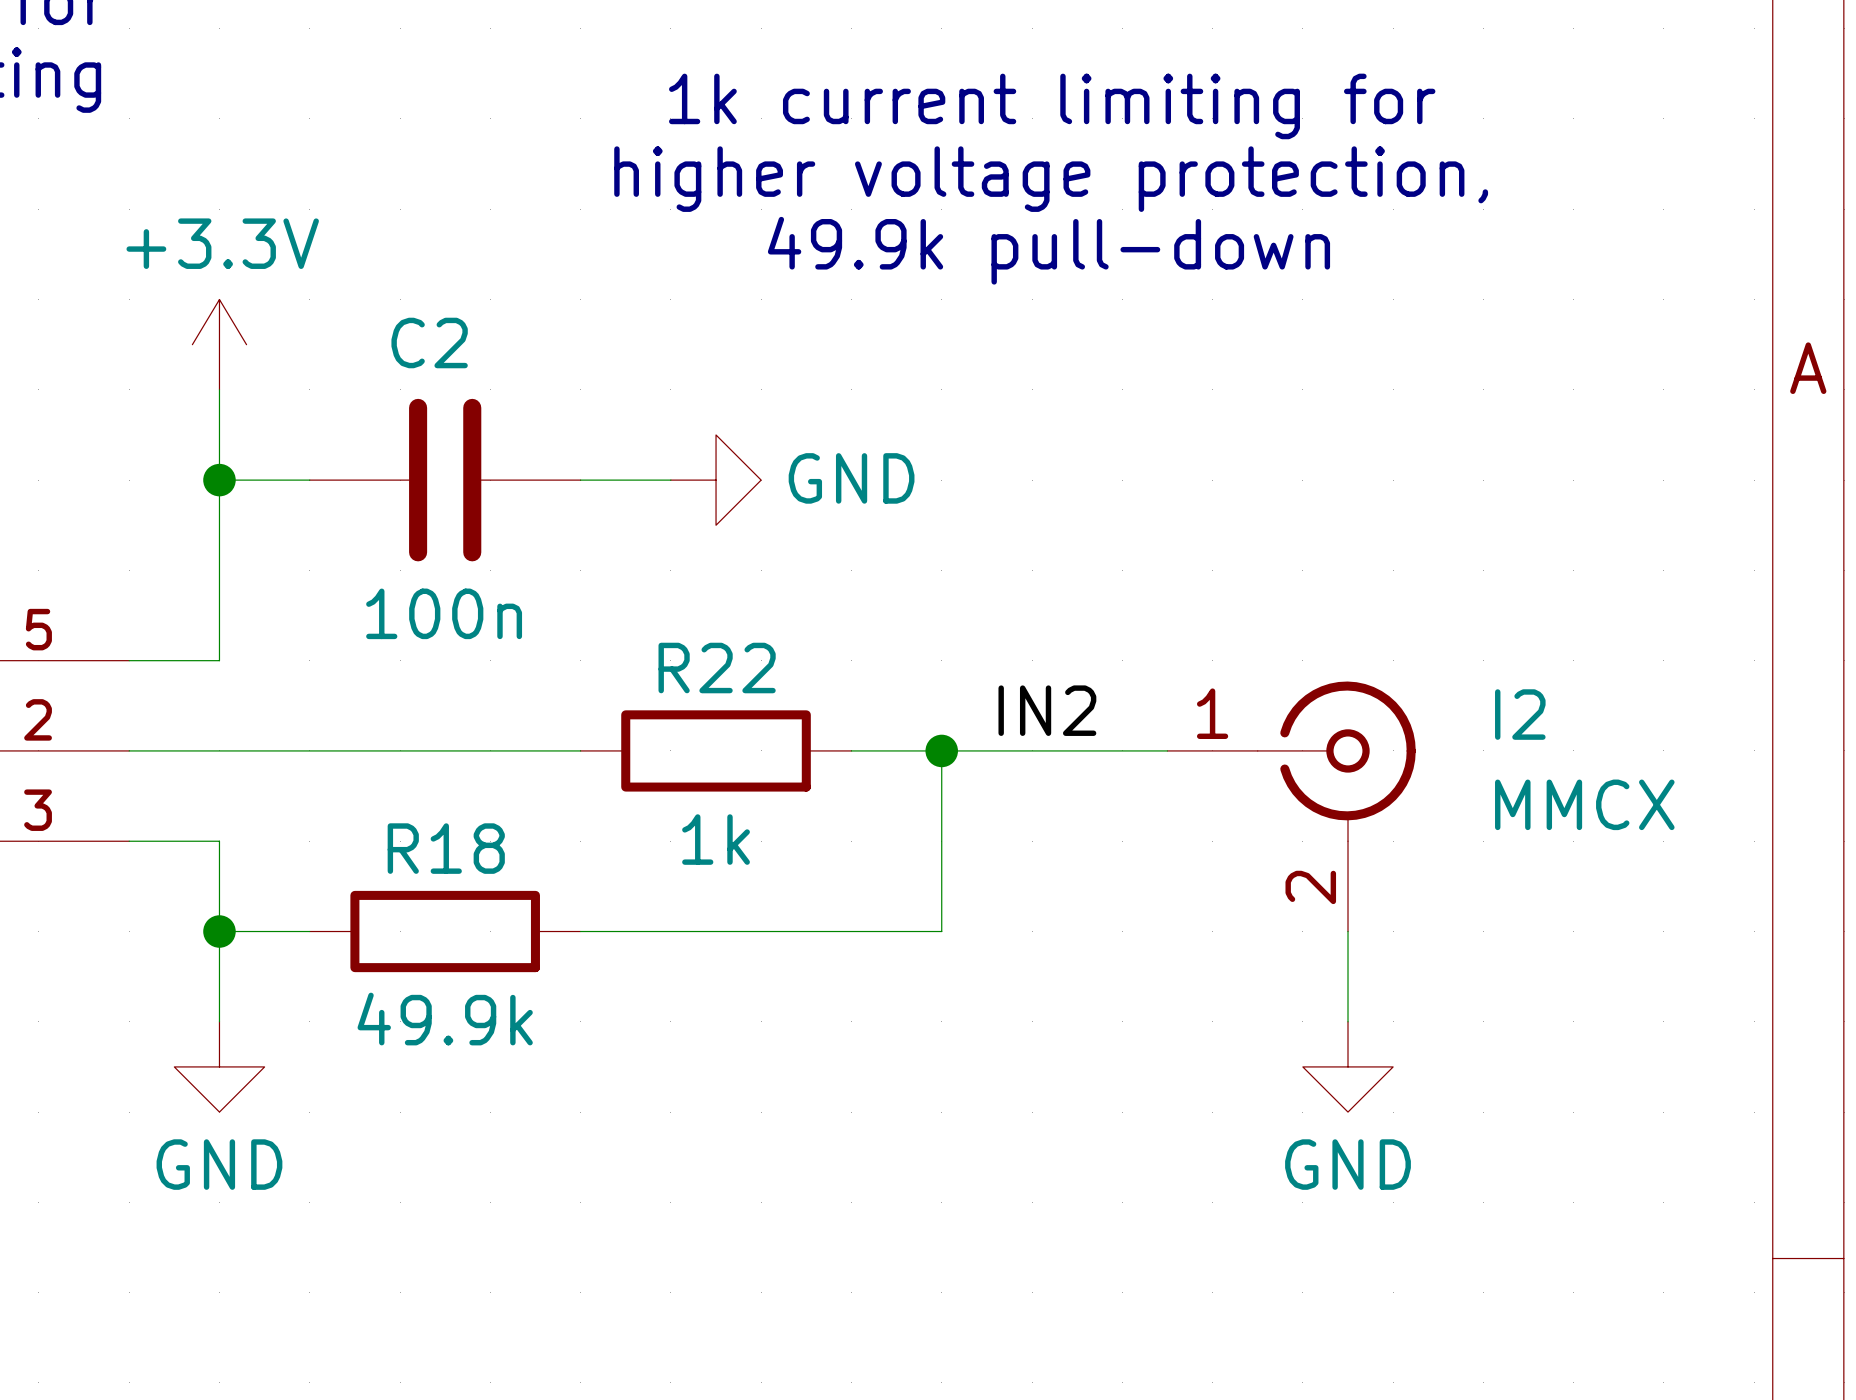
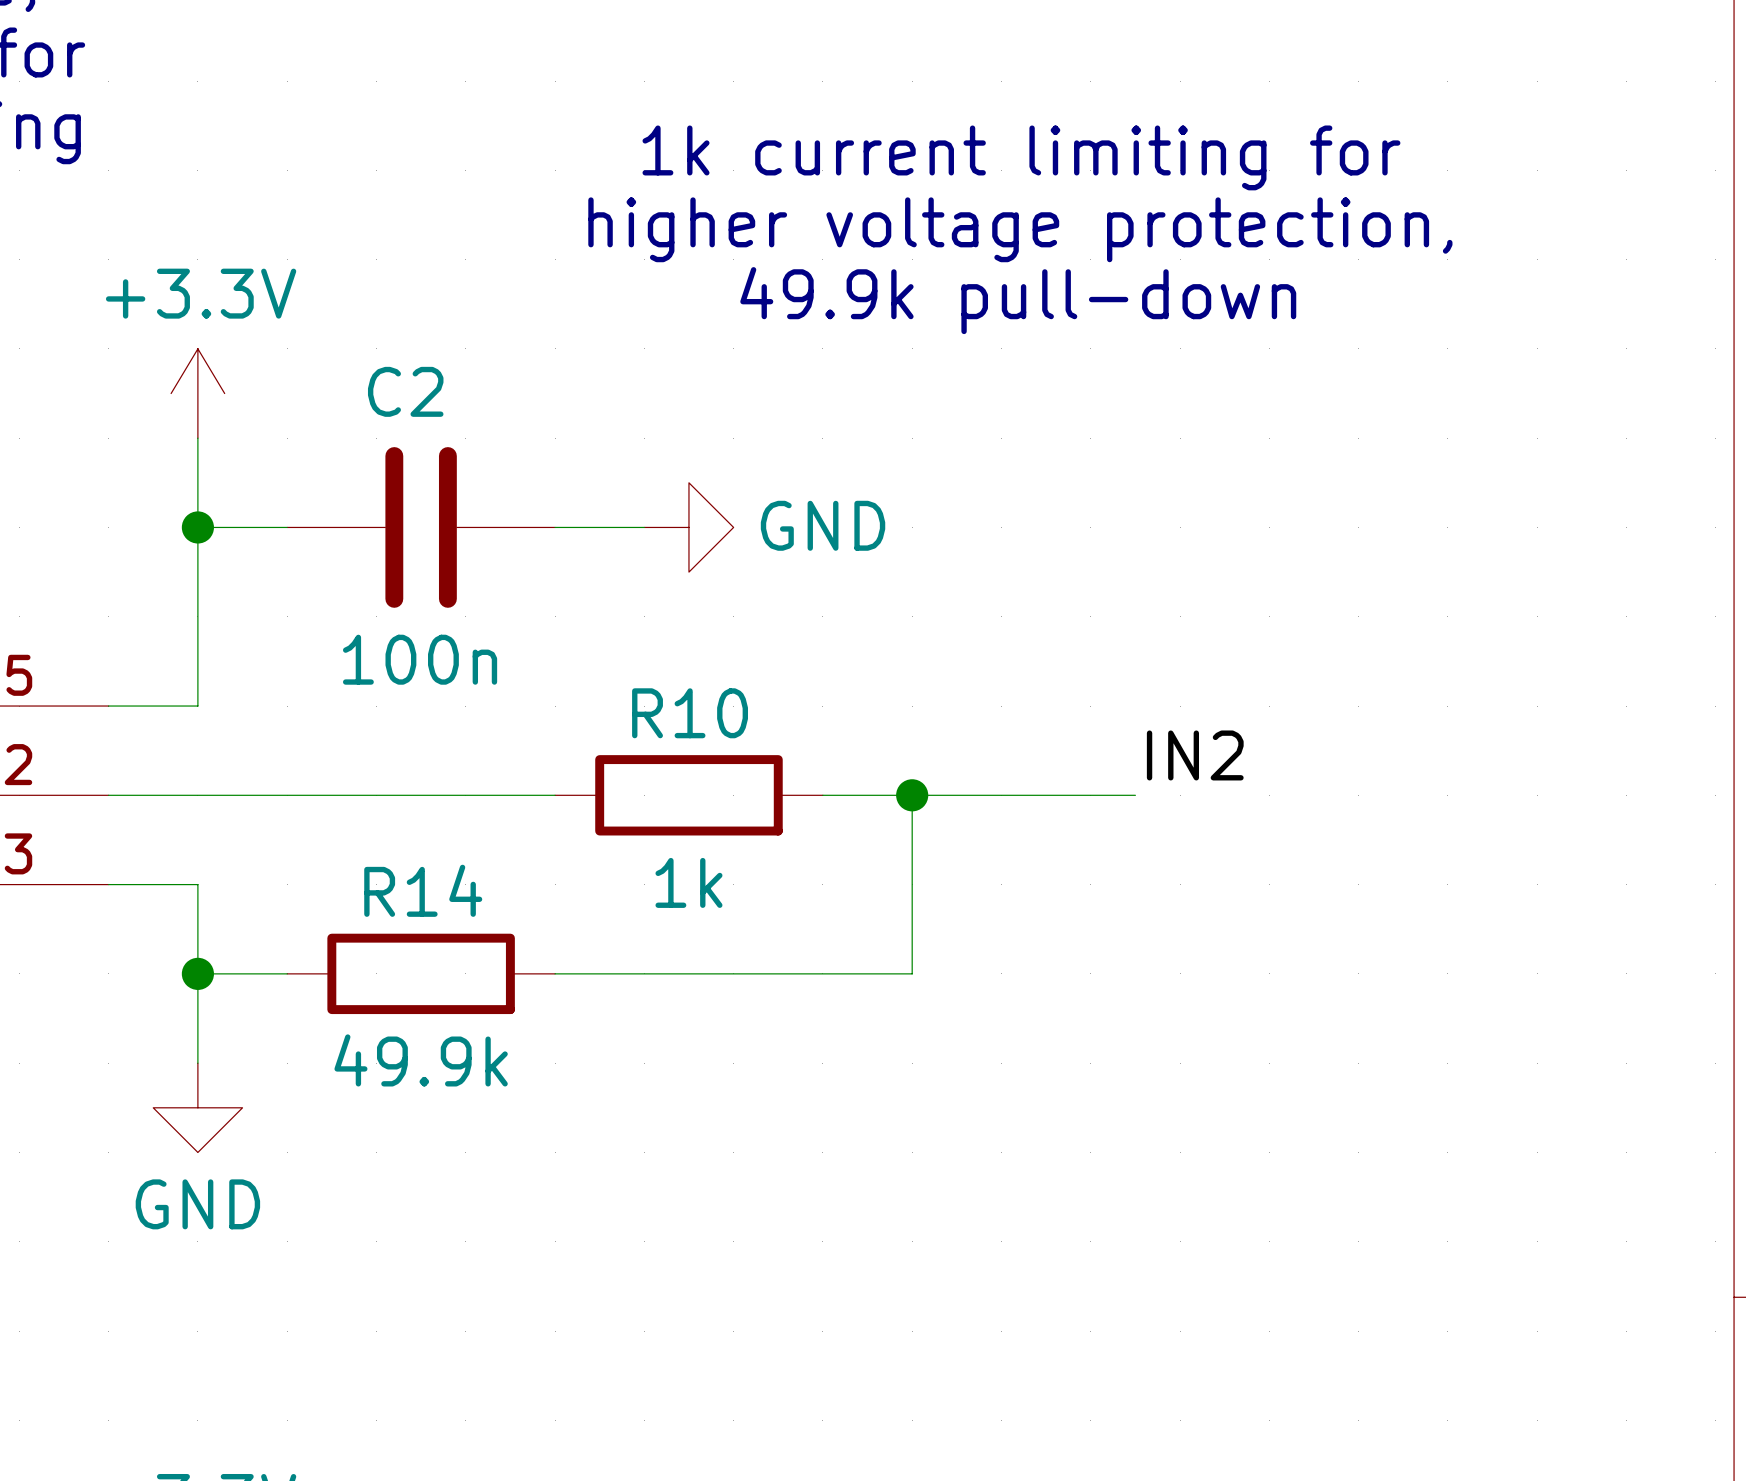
R22 name: R22 (717, 668) -> R10 (690, 713)
label position: IN2 (1047, 710) -> IN2 (1195, 755)
I2: MMCX (1291, 806) -> none
R18 name: R18 (446, 848) -> R14 (423, 890)
wire: (1348, 931) (1348, 1021) -> none
power symbol: GND (1348, 1066) -> none

